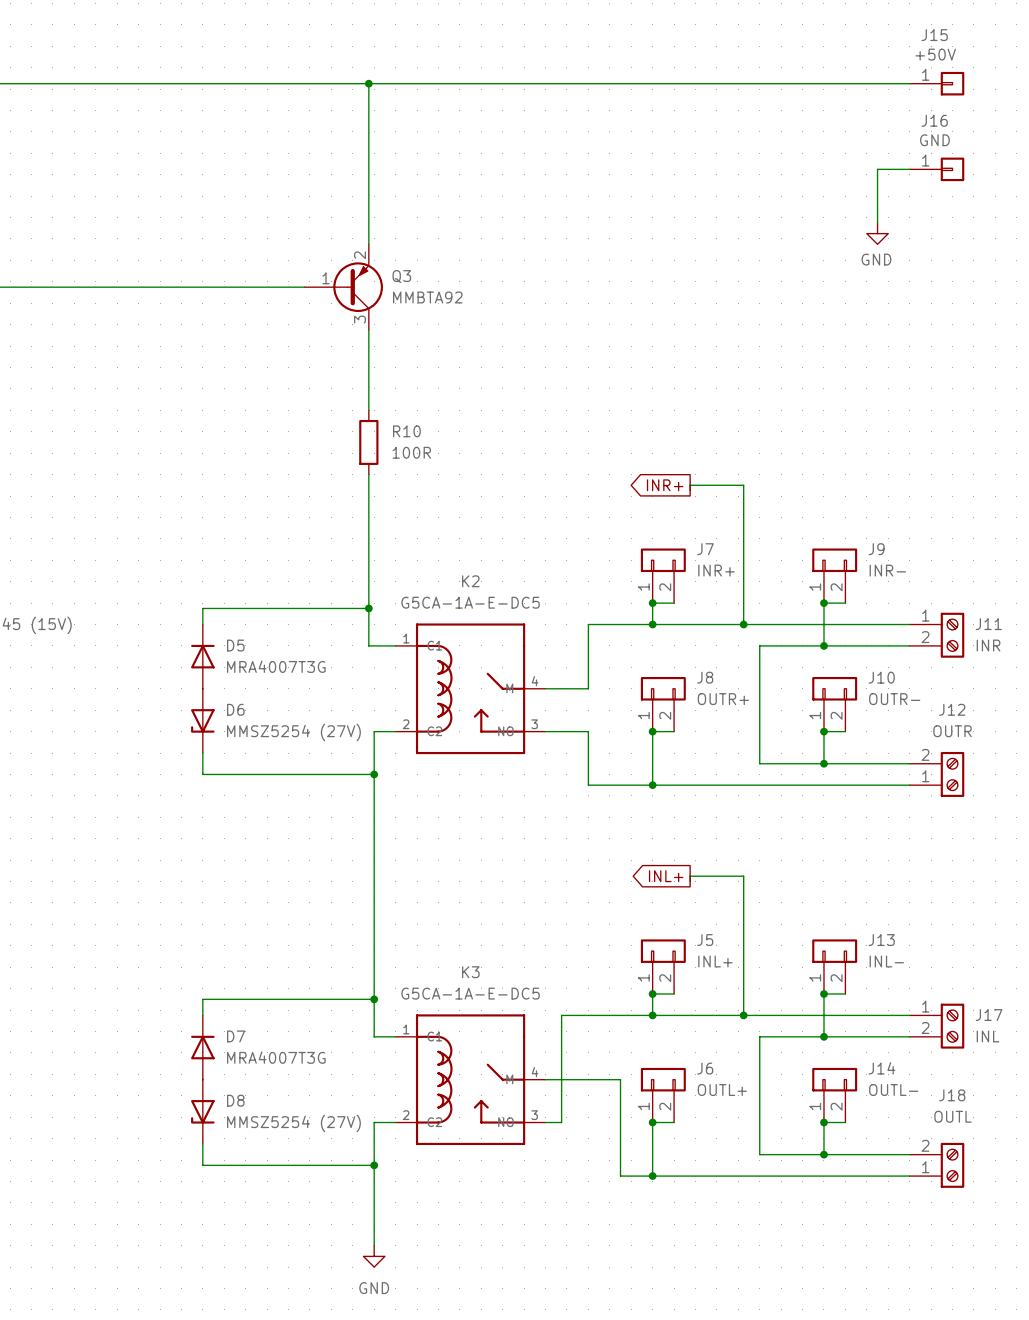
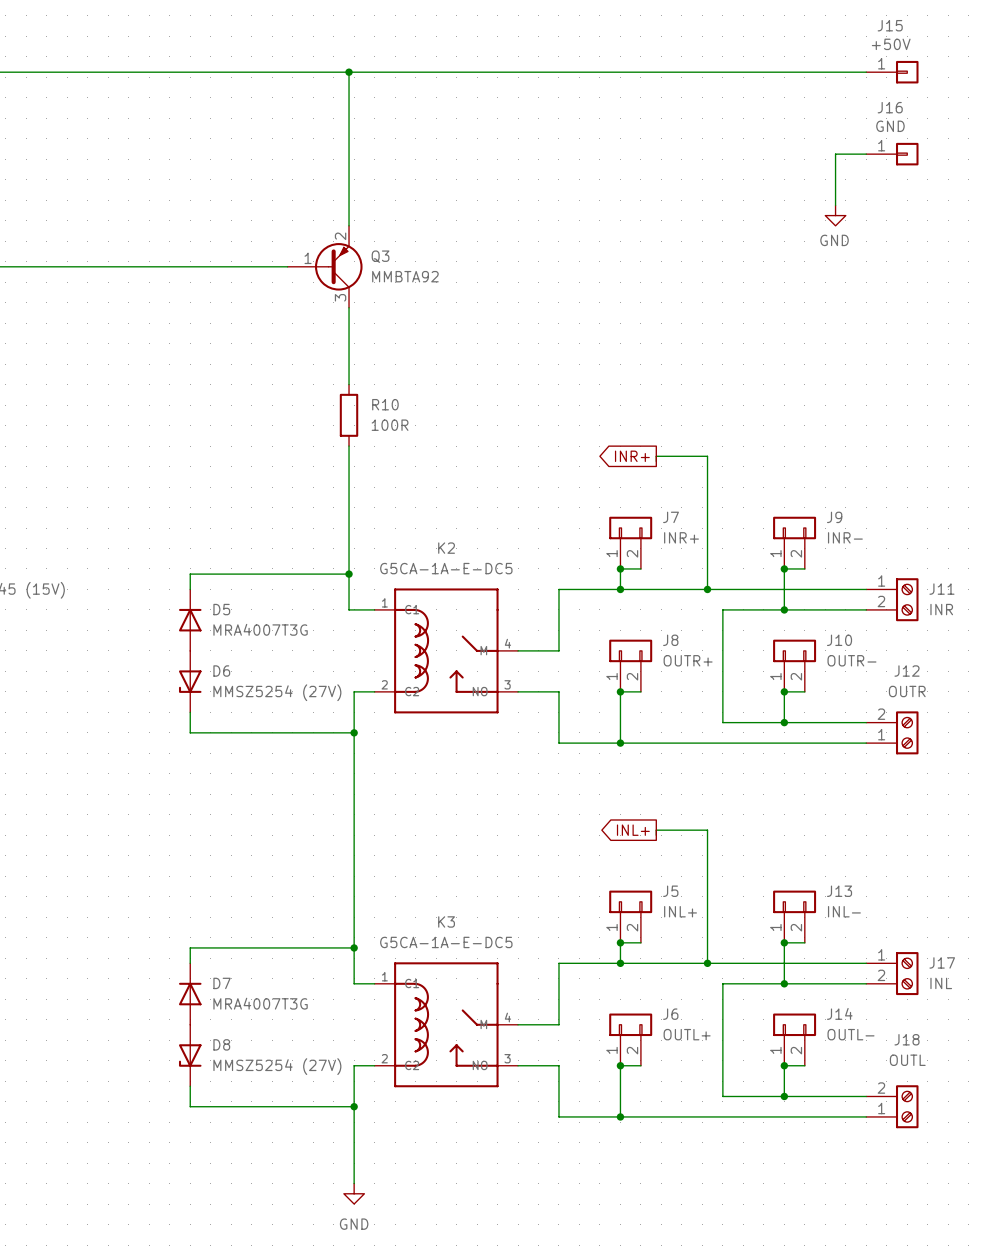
wire: (588, 1015) (561, 1015) (561, 1122) -> (558, 963) (558, 1024)
wire: (588, 1079) (620, 1079) (620, 1176) -> (533, 1065) (558, 1065) (558, 1116) (589, 1116)

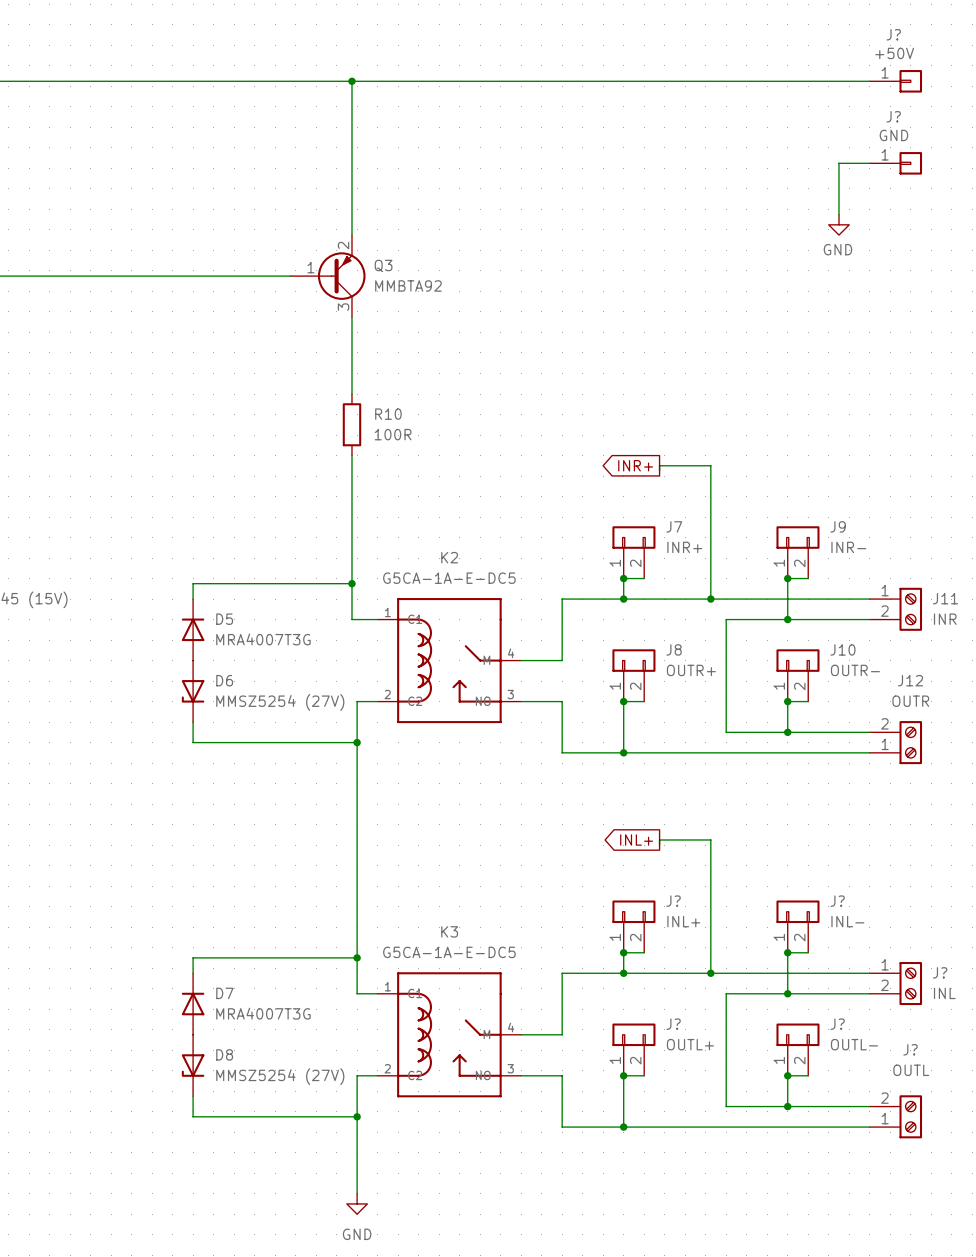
J15 name: J15 (890, 25) -> J? (893, 34)
J16 name: J16 (890, 107) -> J? (893, 116)
J5 name: J5 (670, 891) -> J? (673, 901)
J13 name: J13 (839, 891) -> J? (837, 901)
J17 name: J17 (942, 962) -> J? (940, 972)
J14 name: J14 (839, 1013) -> J? (837, 1024)
J6 name: J6 (670, 1014) -> J? (673, 1024)
J18 name: J18 (907, 1039) -> J? (910, 1049)

